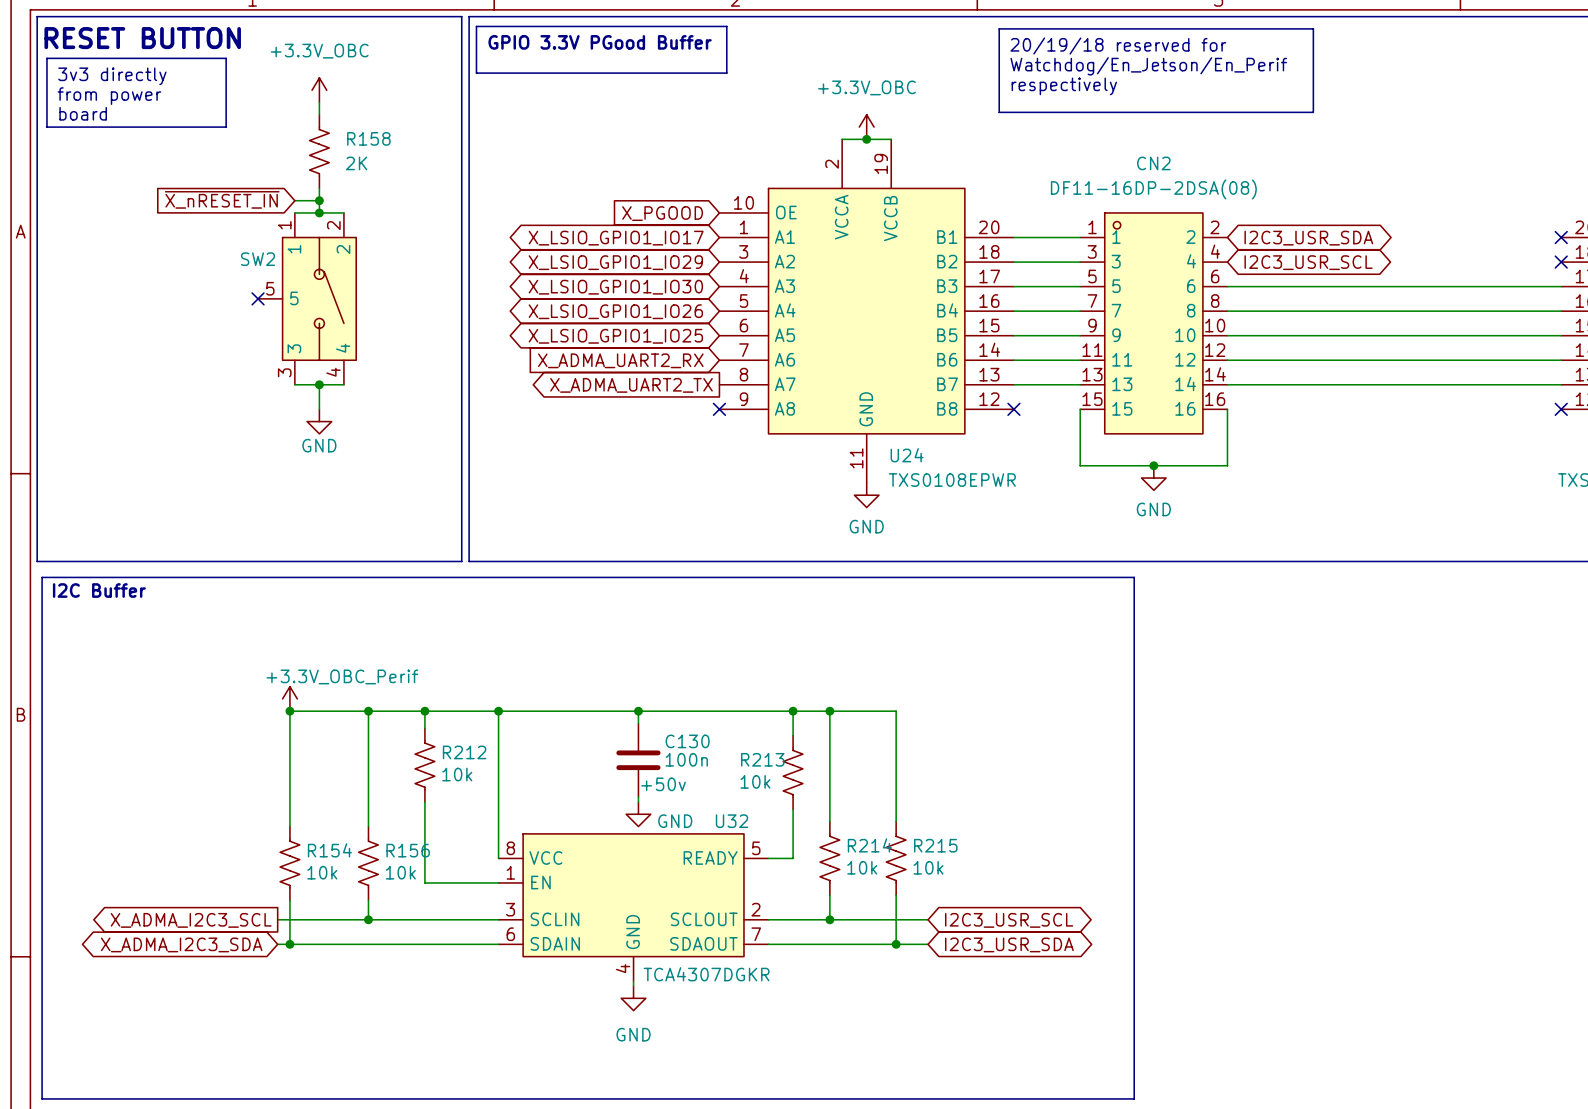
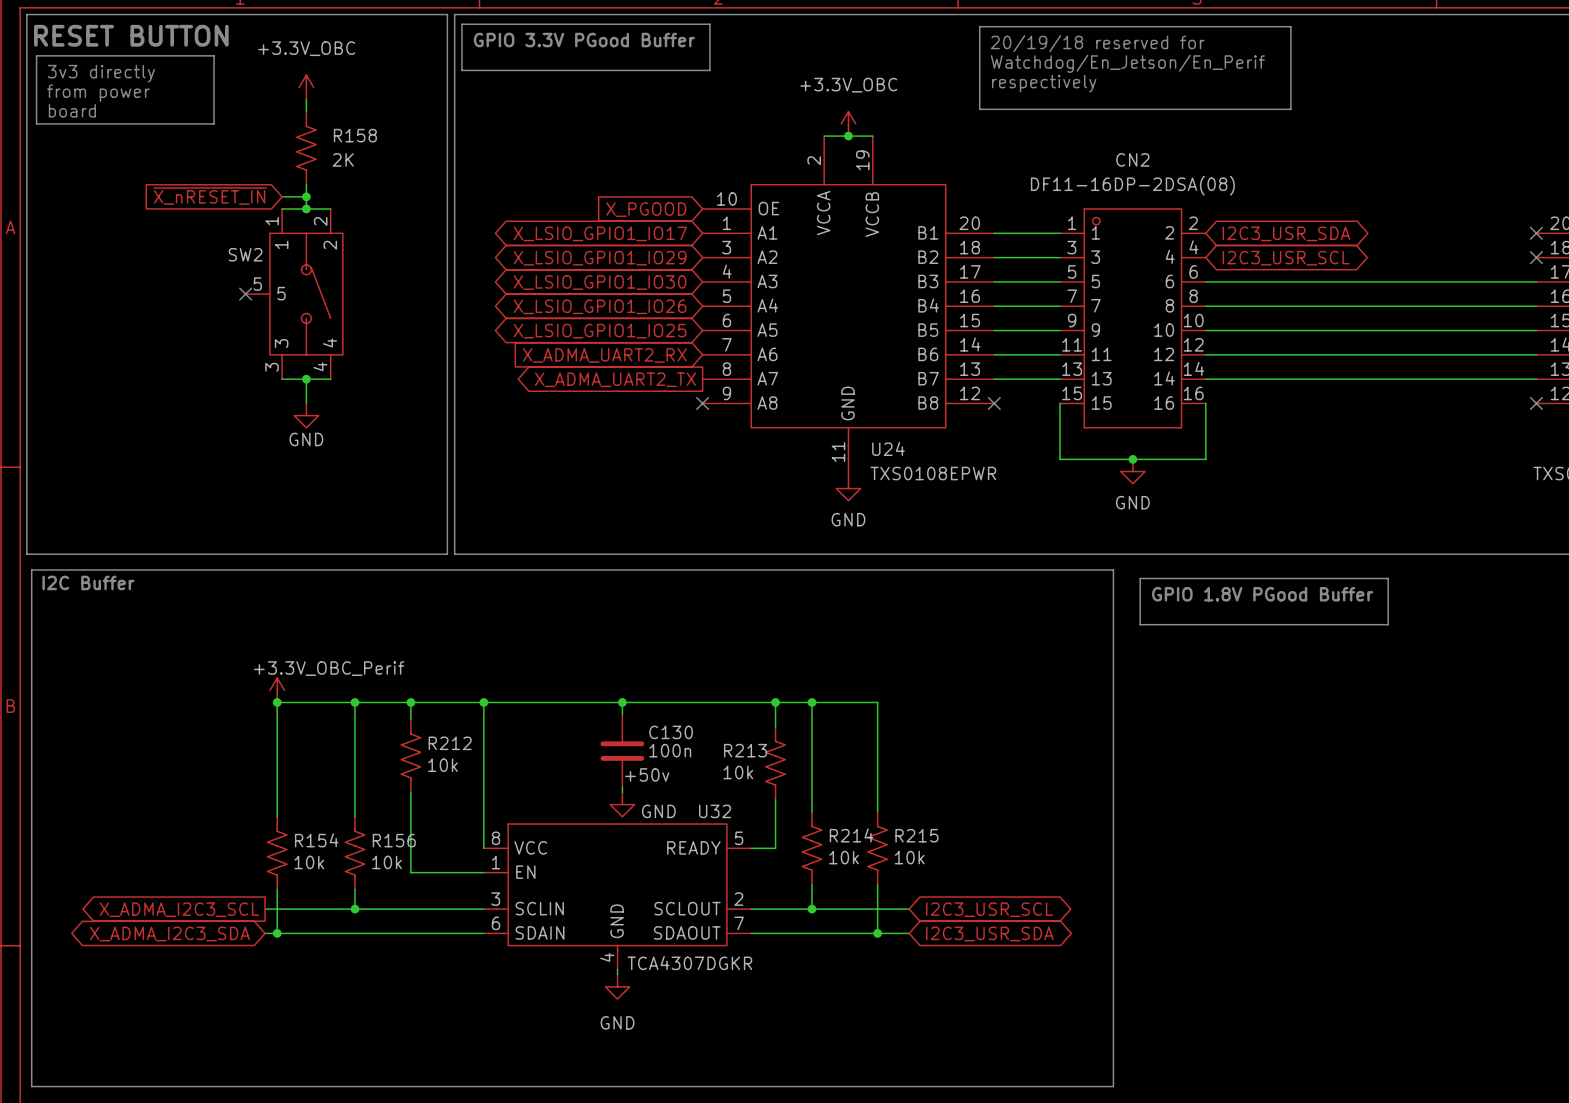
line: none -> (1140, 578) (1388, 578) (1388, 624) (1140, 624) (1140, 578)
text: none -> GPIO 1.8V PGood Buffer (1262, 594)

